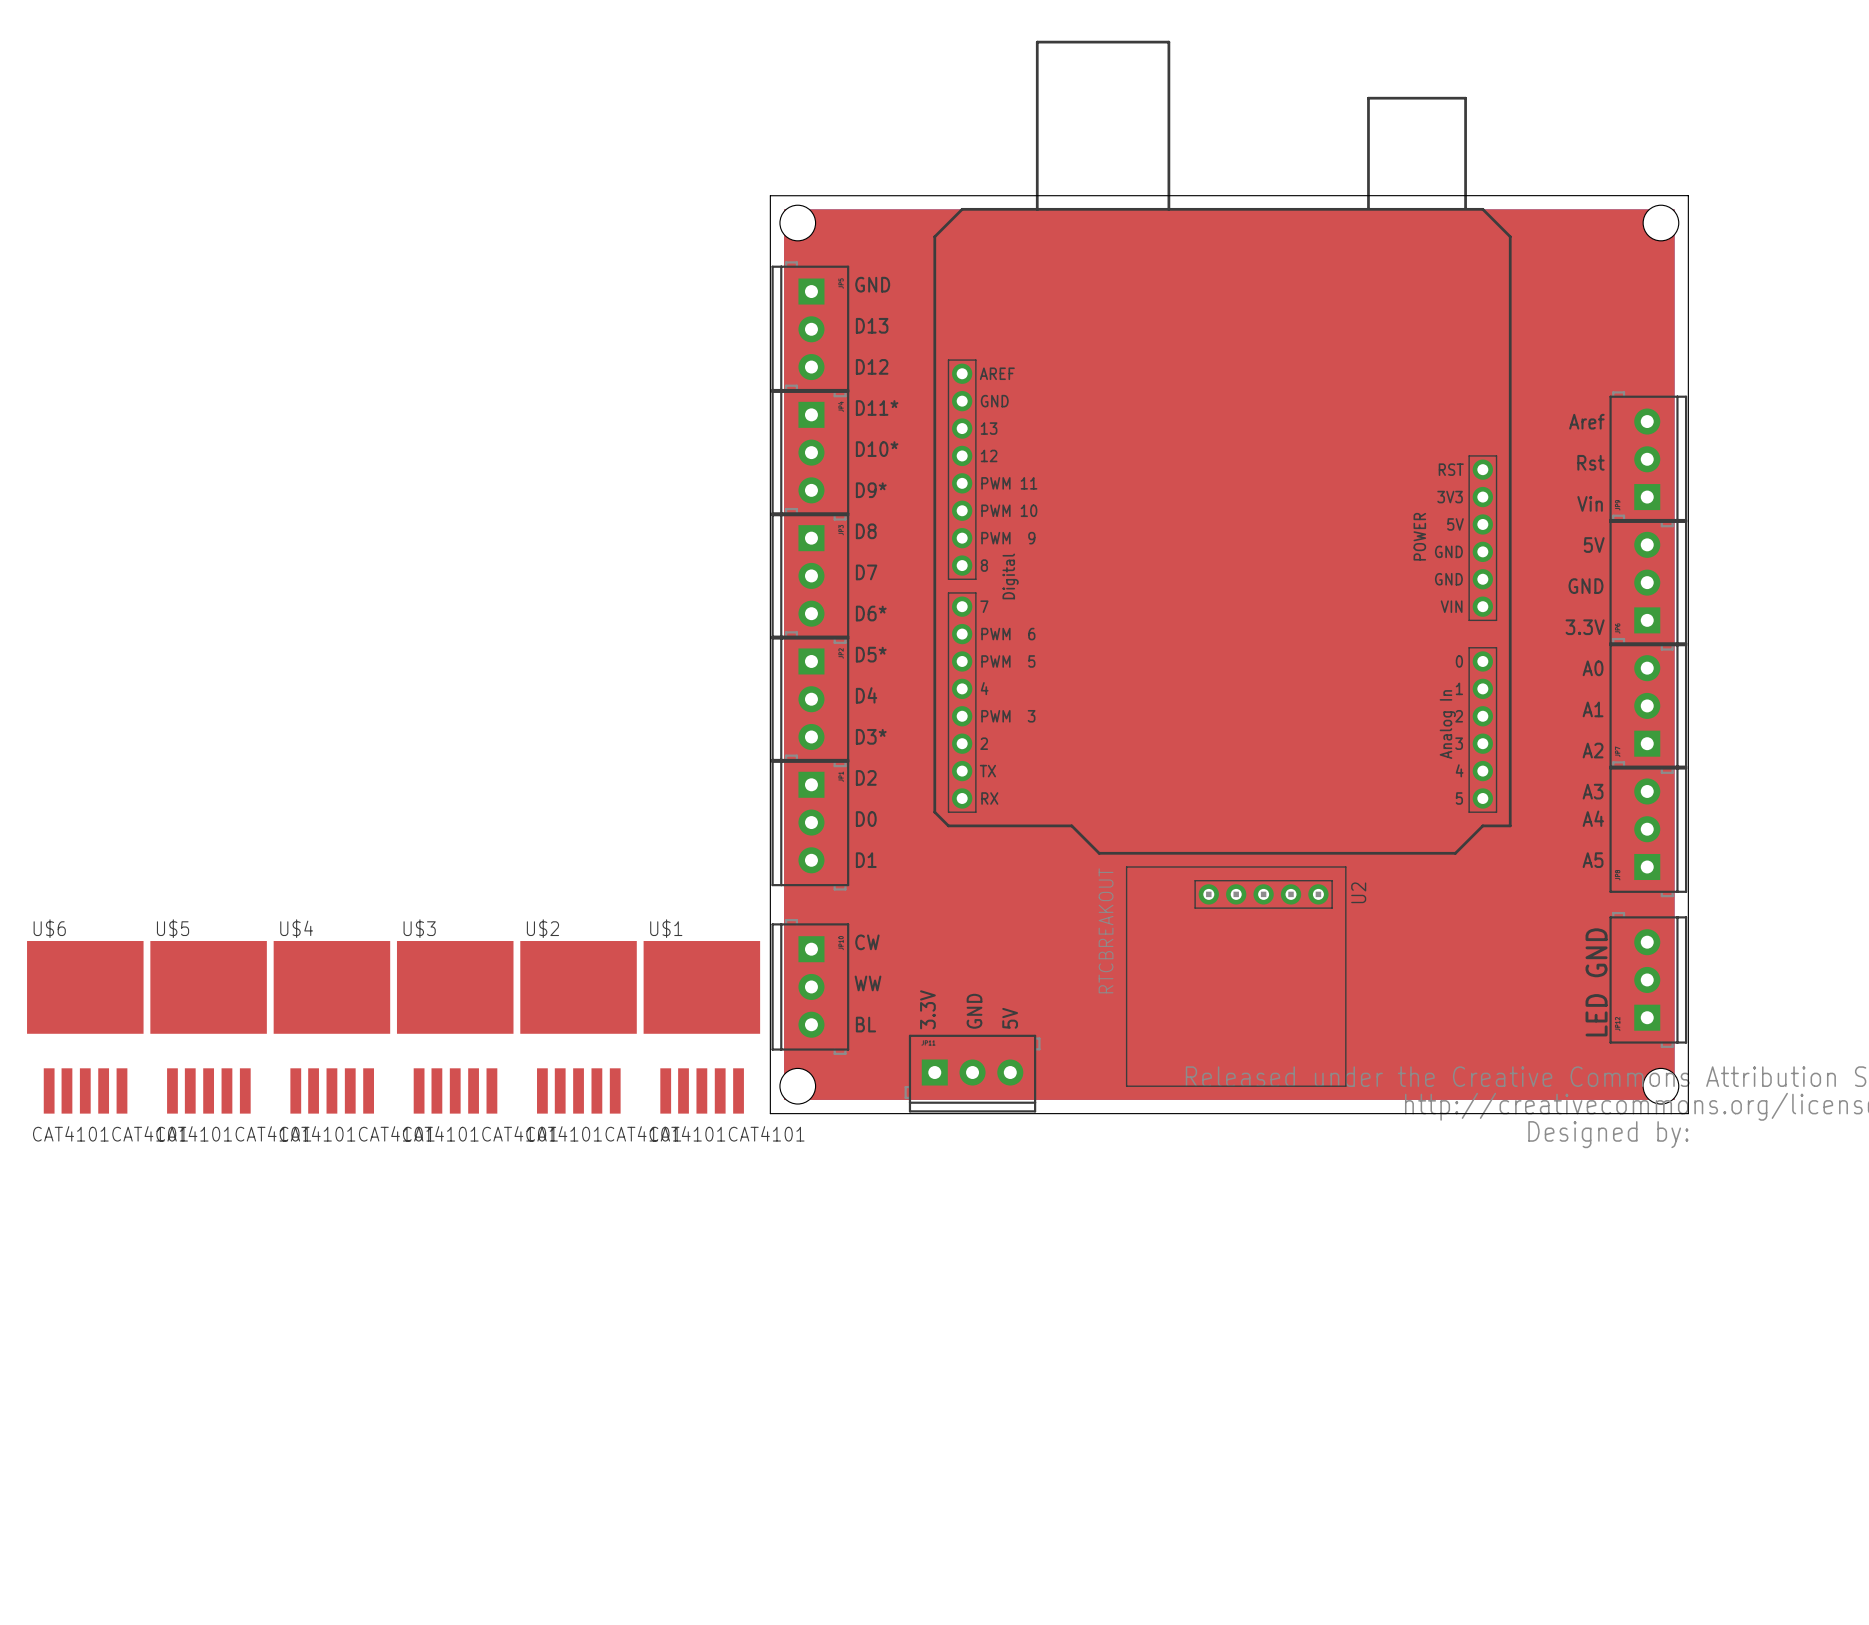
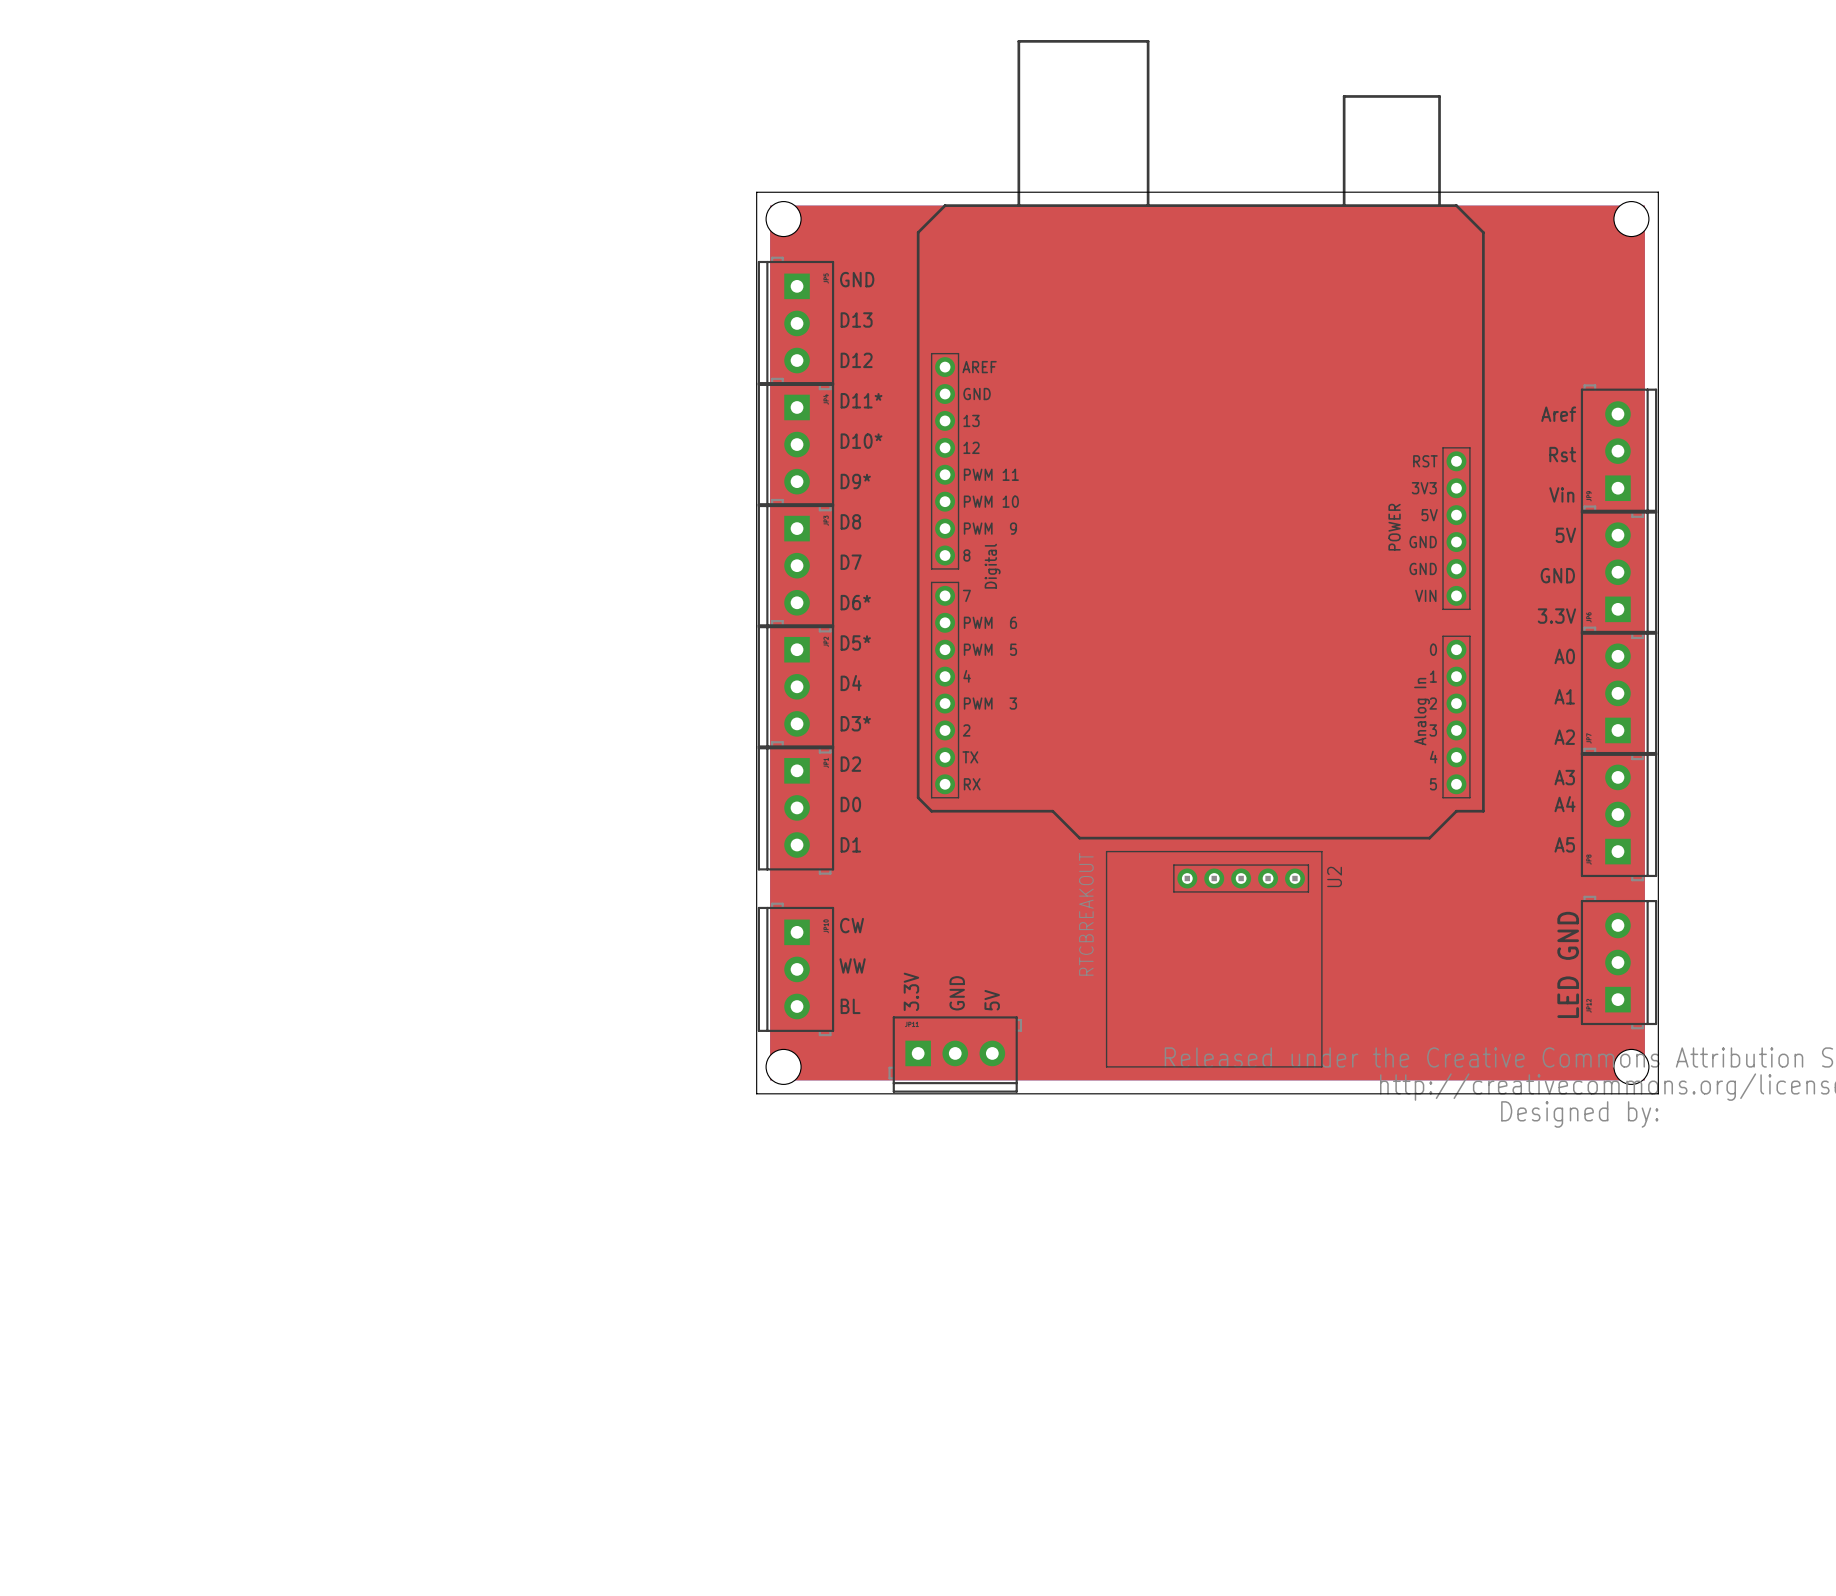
U$6: CAT4101CAT4101 (85, 1027) -> none
U$5: CAT4101CAT4101 (208, 1027) -> none
U$4: CAT4101CAT4101 (331, 1027) -> none
U$3: CAT4101CAT4101 (455, 1027) -> none
U$2: CAT4101CAT4101 (578, 1027) -> none
U$1: CAT4101CAT4101 (701, 1027) -> none

